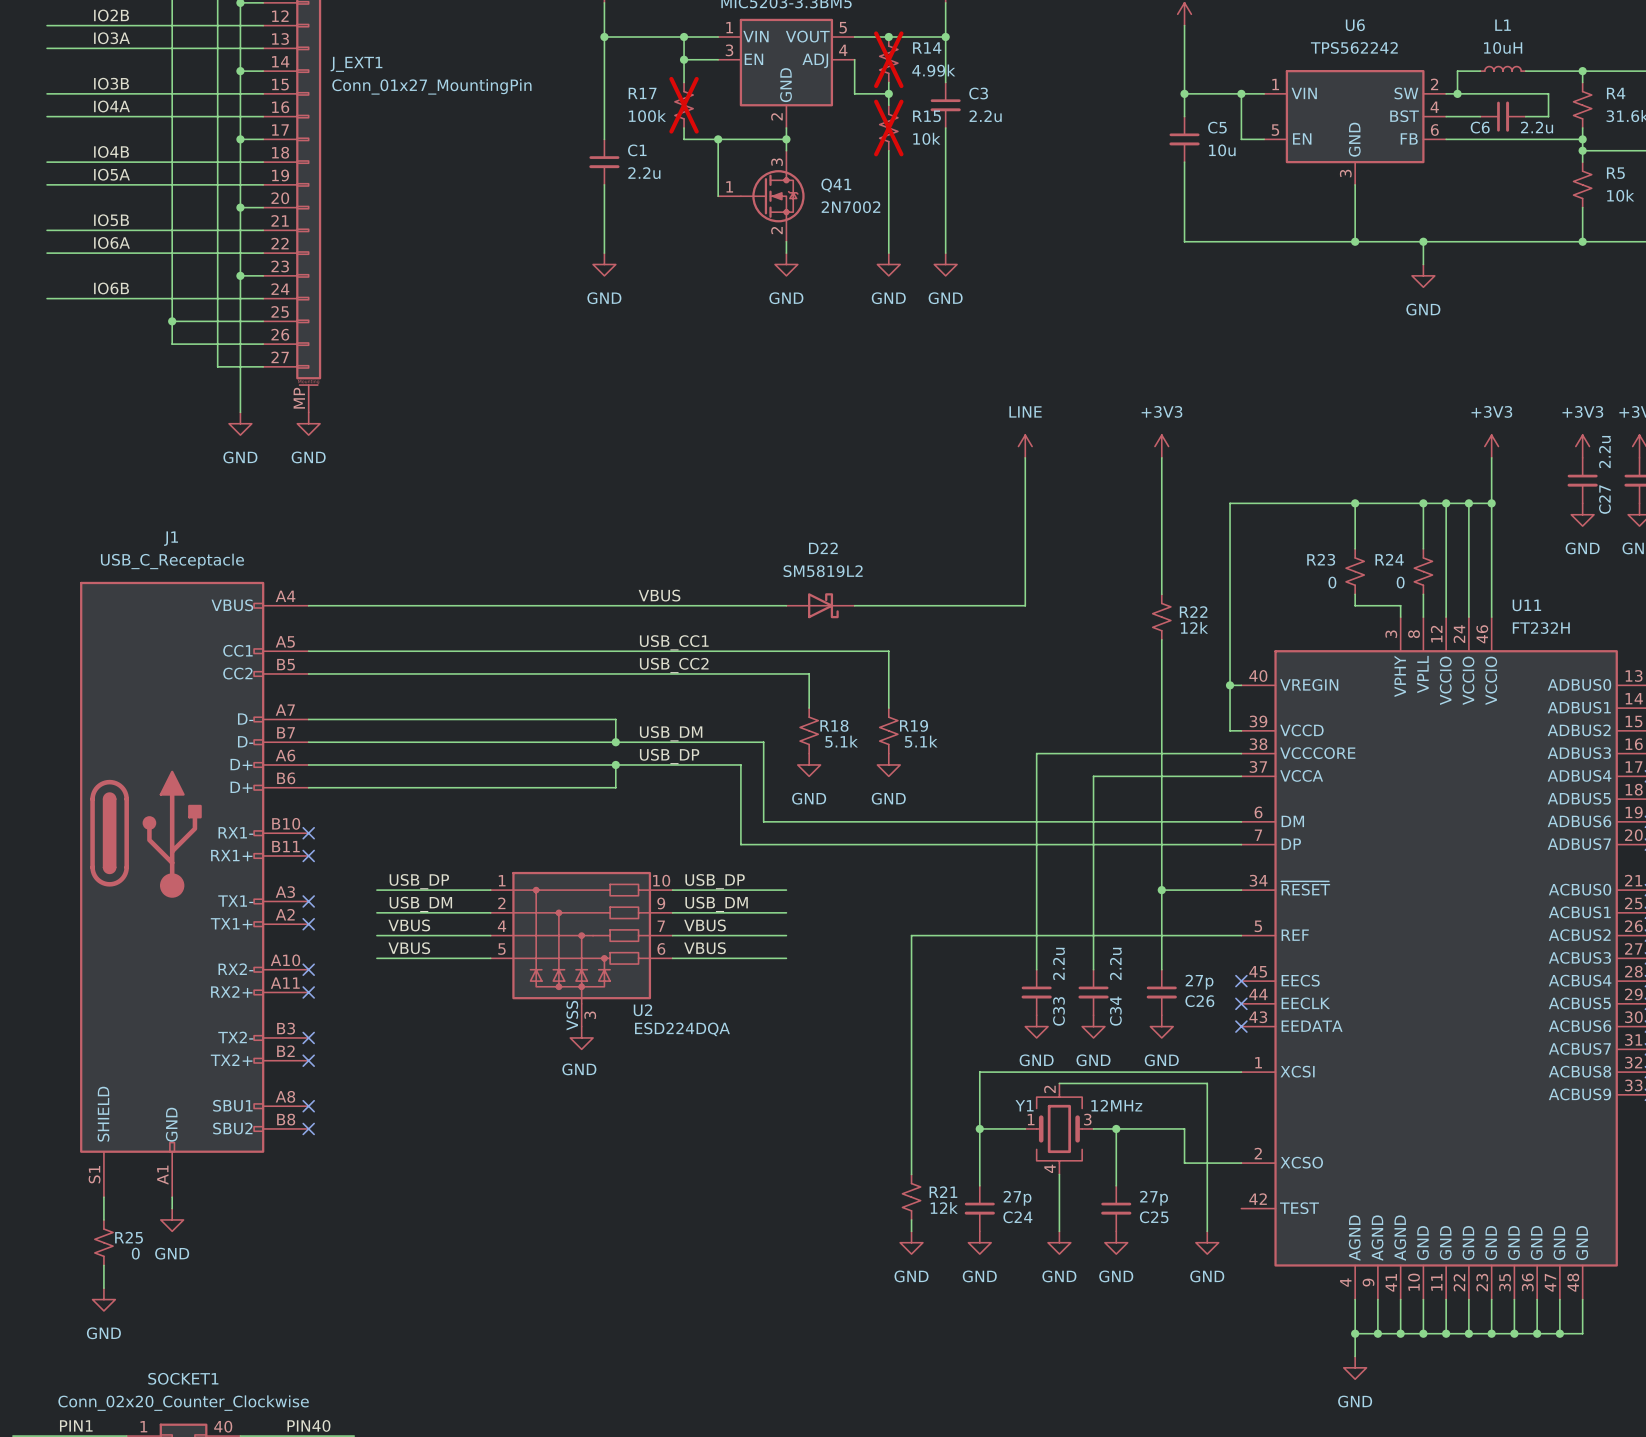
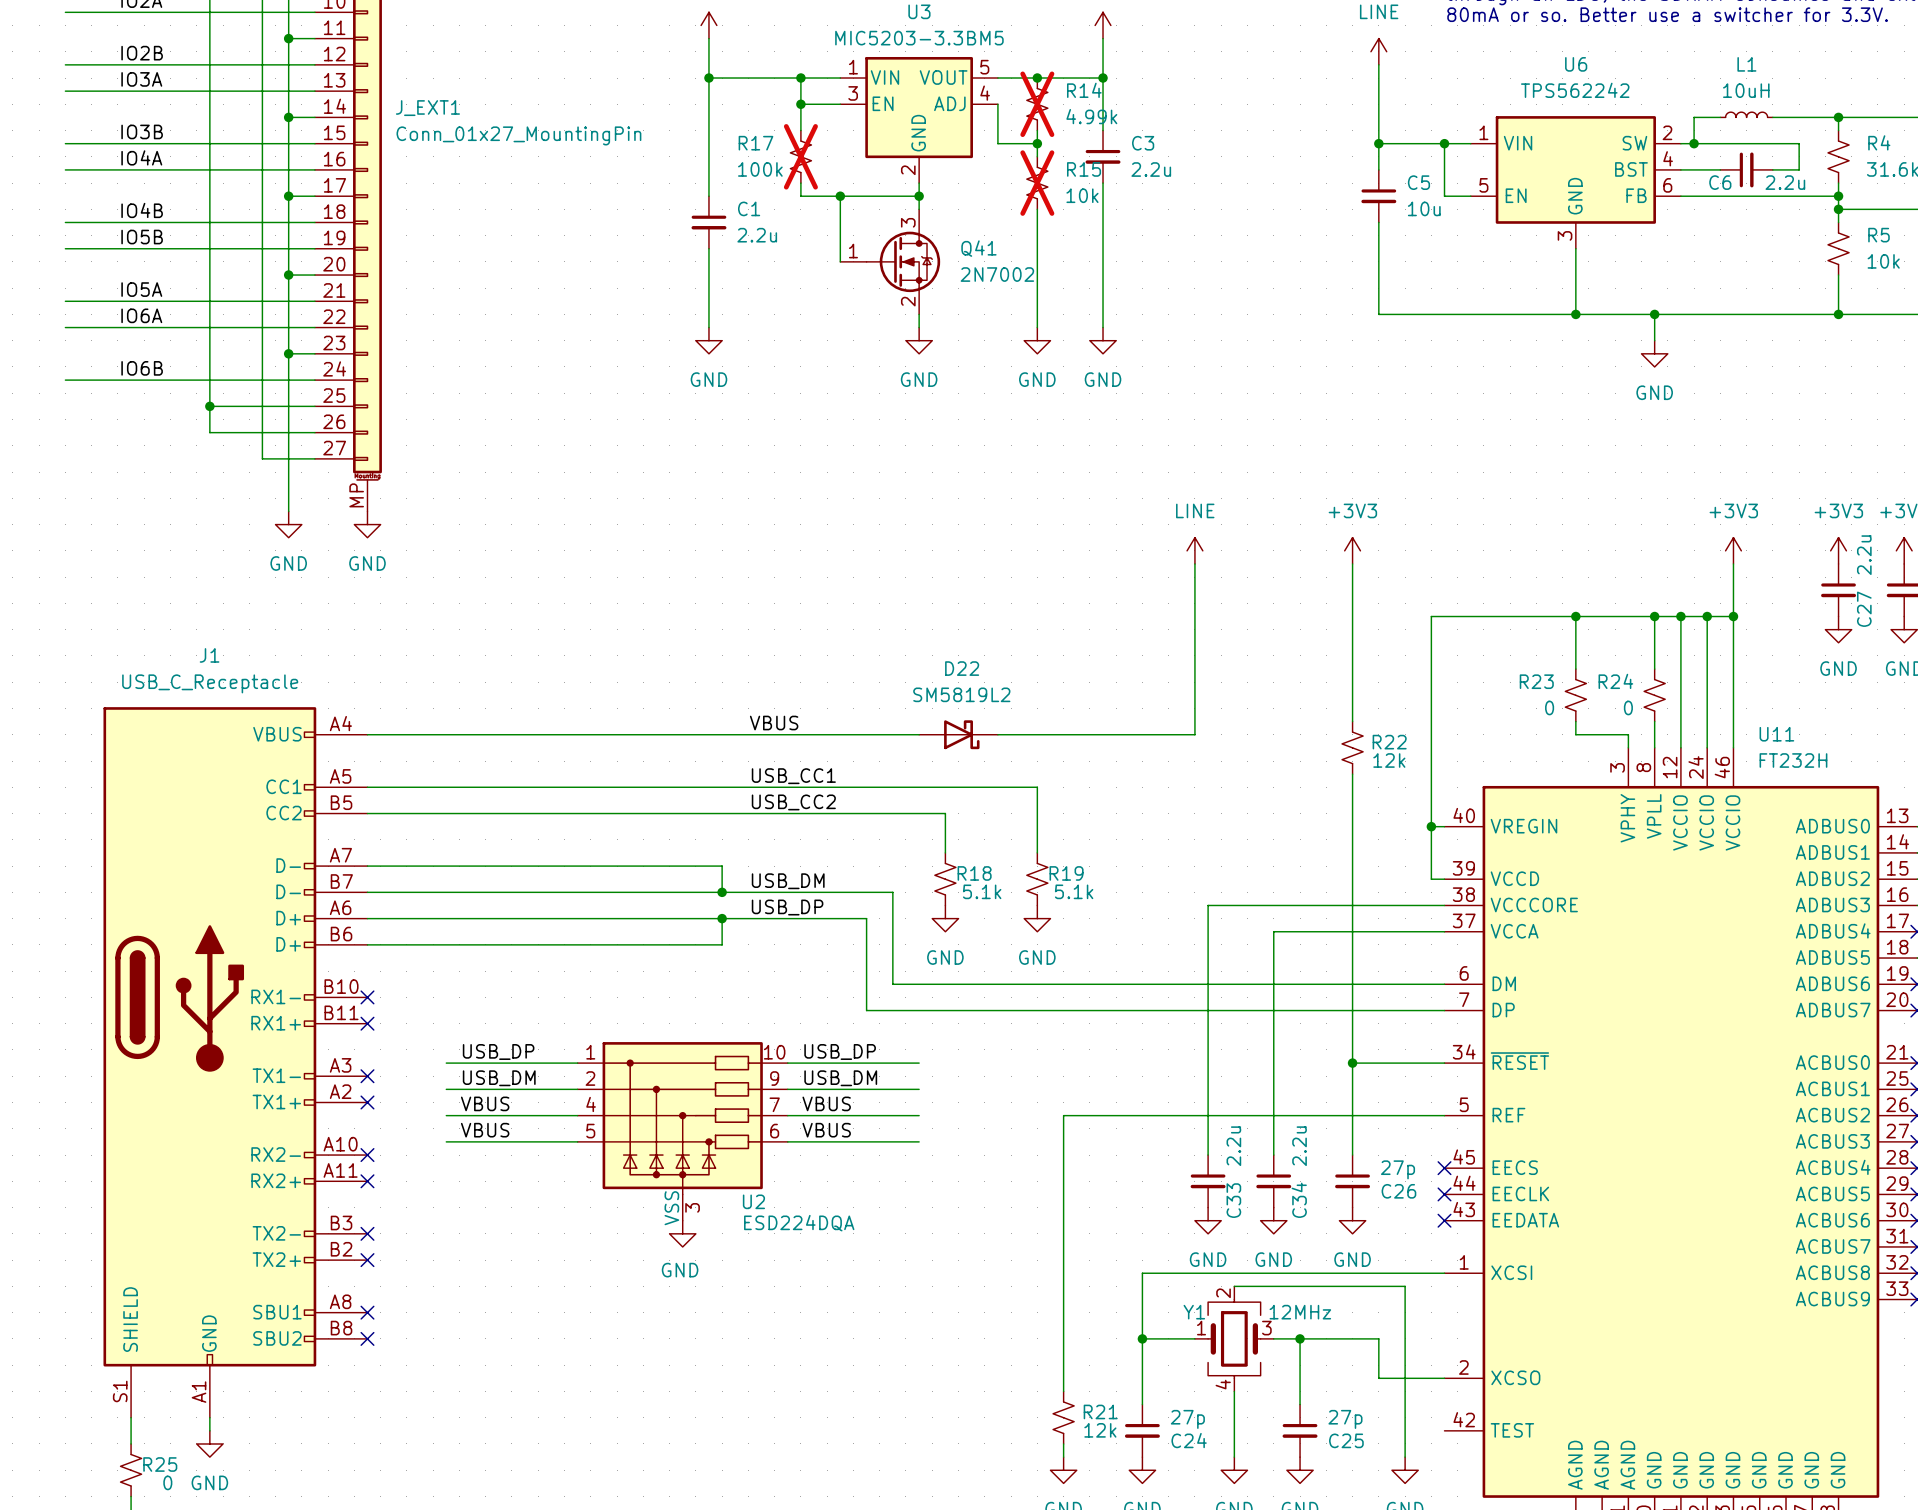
label: IO5A (112, 174) -> IO5B (142, 237)
label: IO5B (111, 220) -> IO5A (141, 289)

